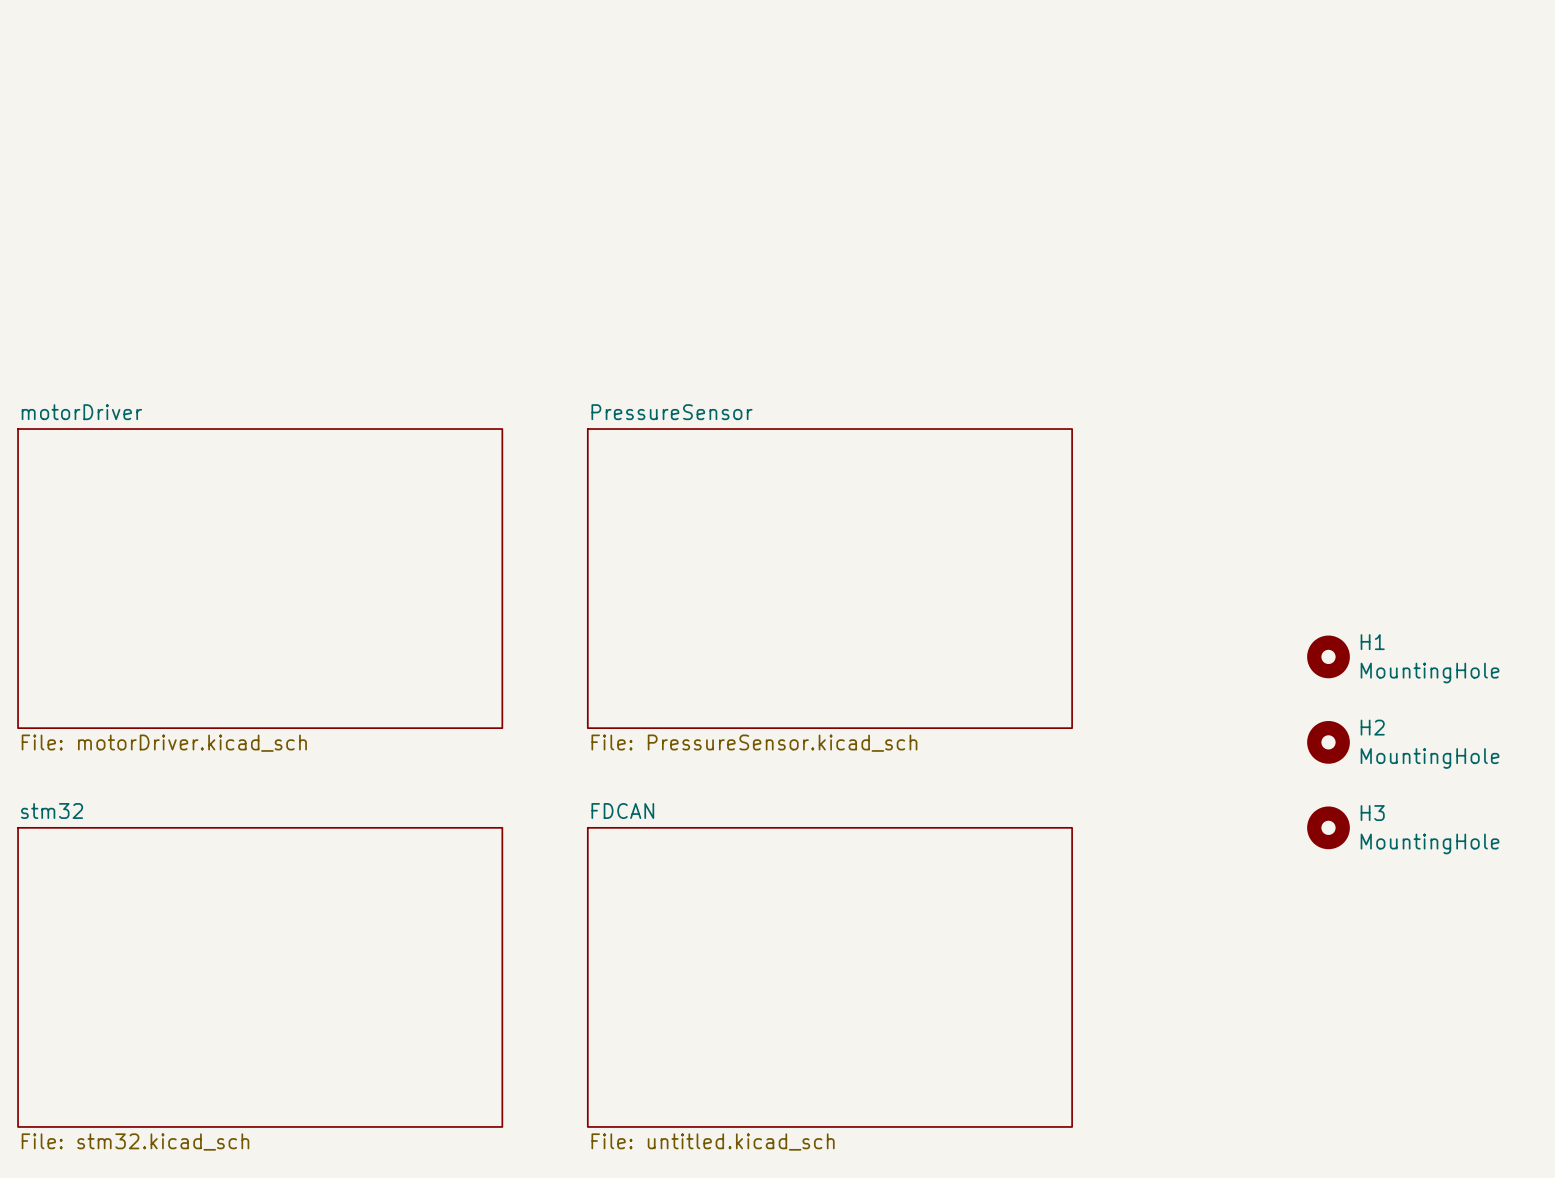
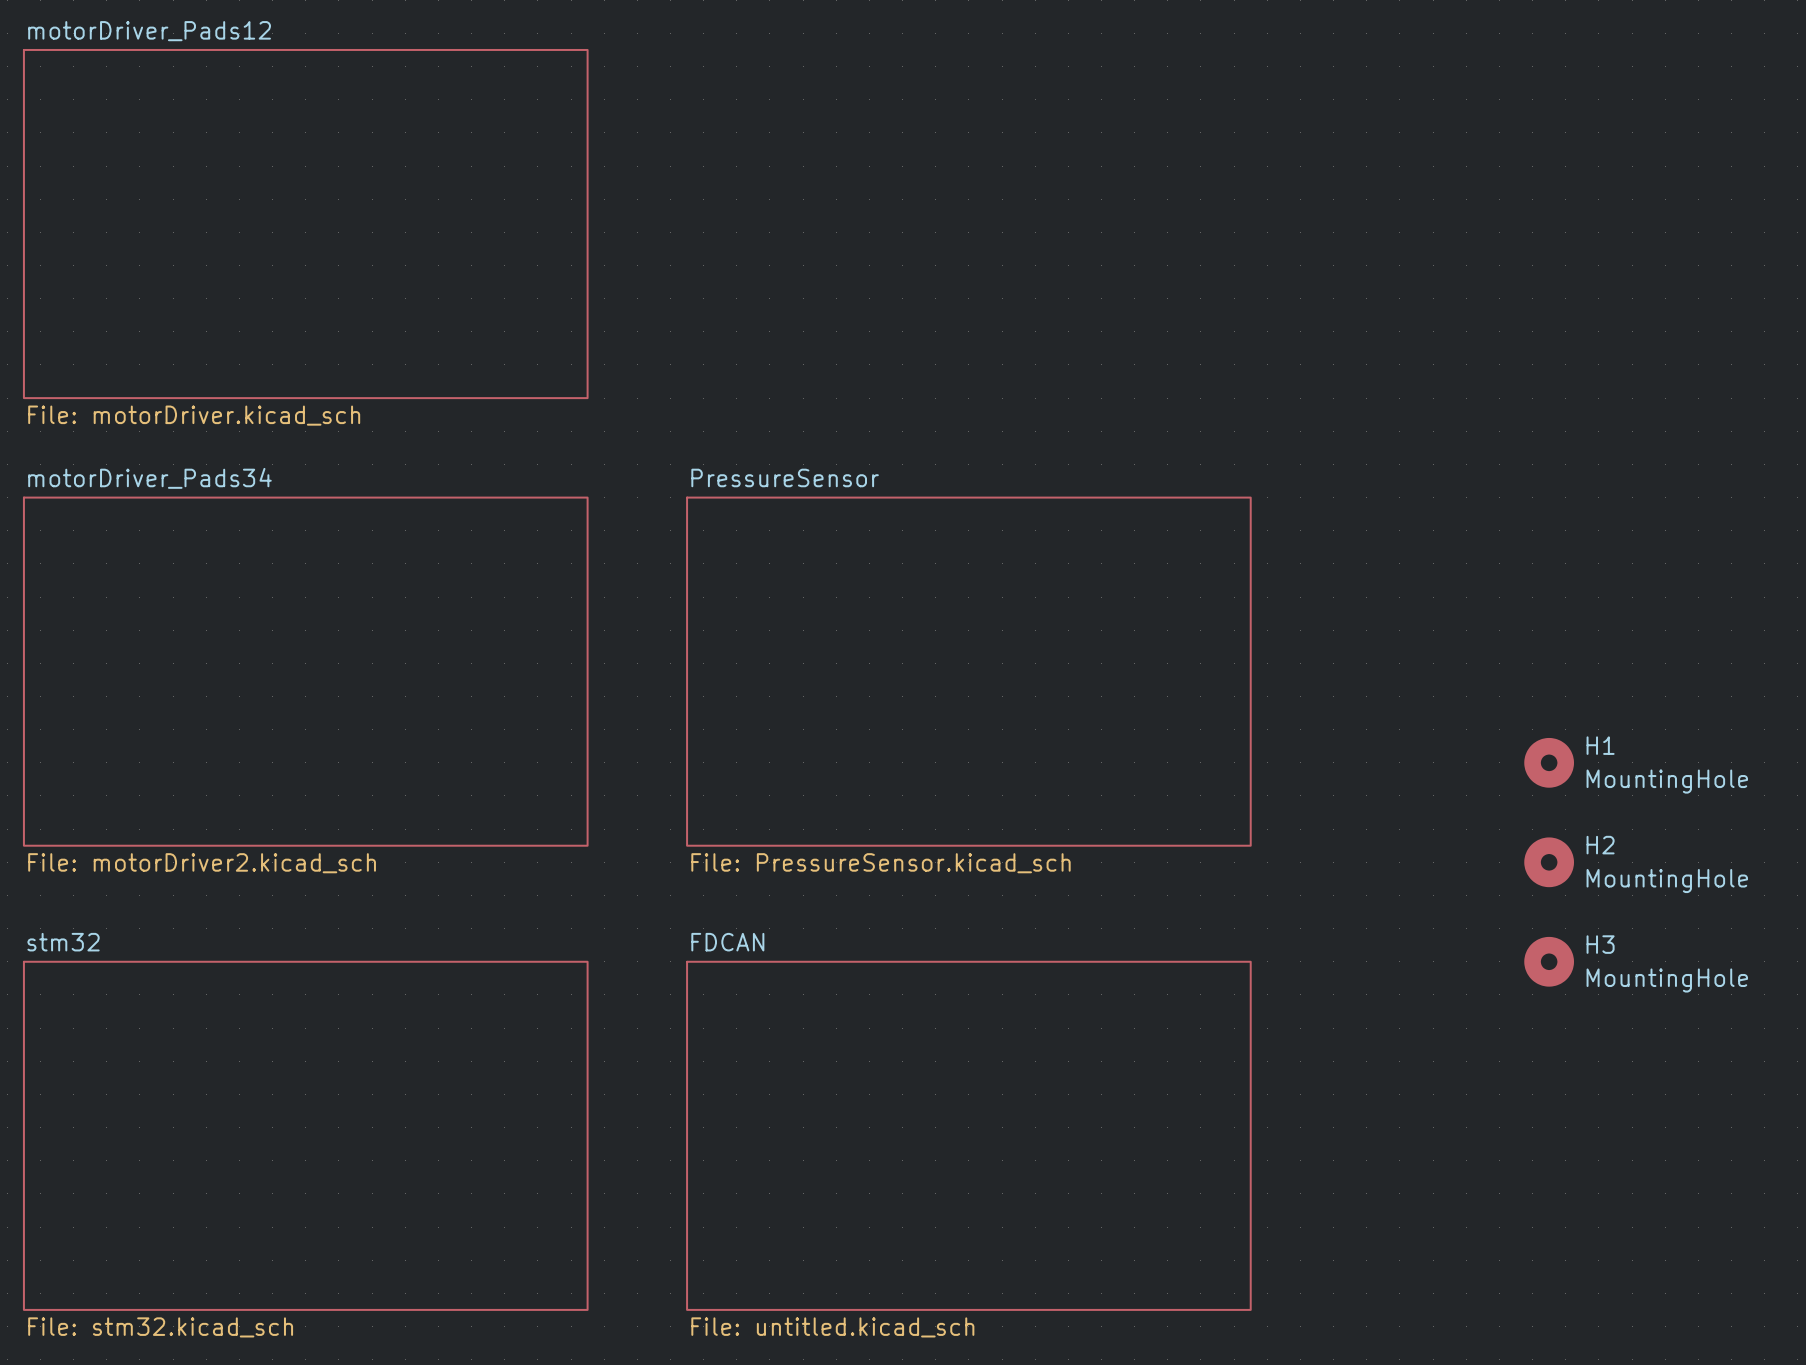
sheet motorDriver_Pads12: none -> File: motorDriver.kicad_sch (305, 224)
sheet motorDriver name: motorDriver (81, 412) -> motorDriver_Pads34 (149, 478)
sheet motorDriver value: File: motorDriver.kicad_sch (164, 743) -> File: motorDriver2.kicad_sch (202, 863)

